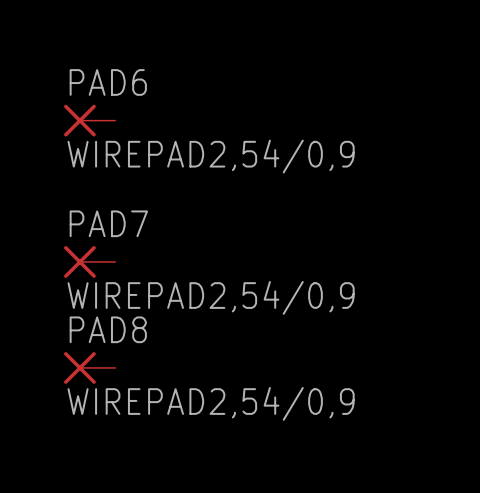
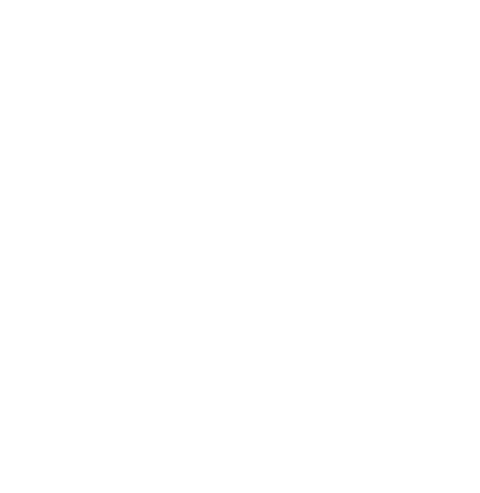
PAD6: WIREPAD2,54/0,9 (89, 120) -> none
PAD7: WIREPAD2,54/0,9 (89, 261) -> none
PAD8: WIREPAD2,54/0,9 (89, 367) -> none

